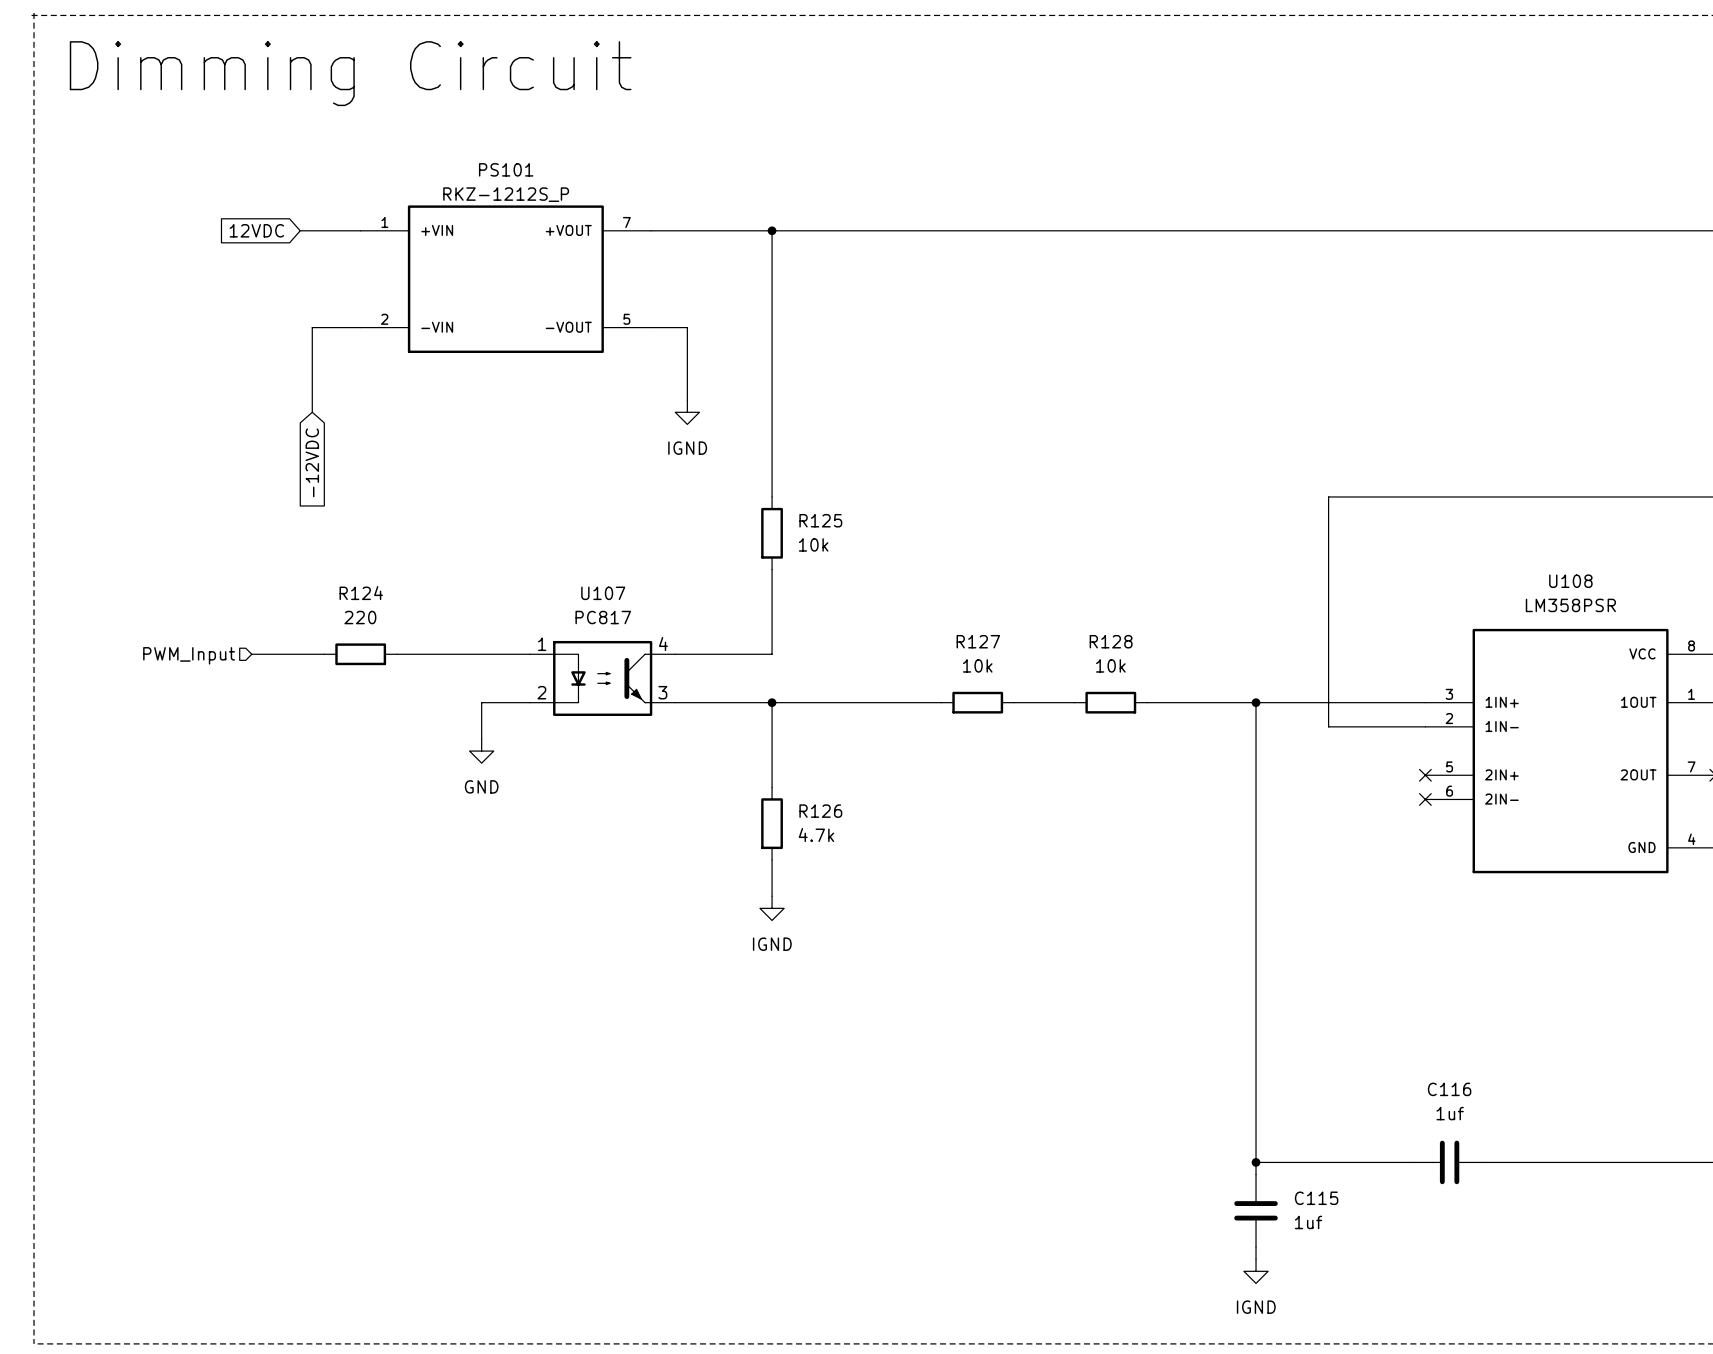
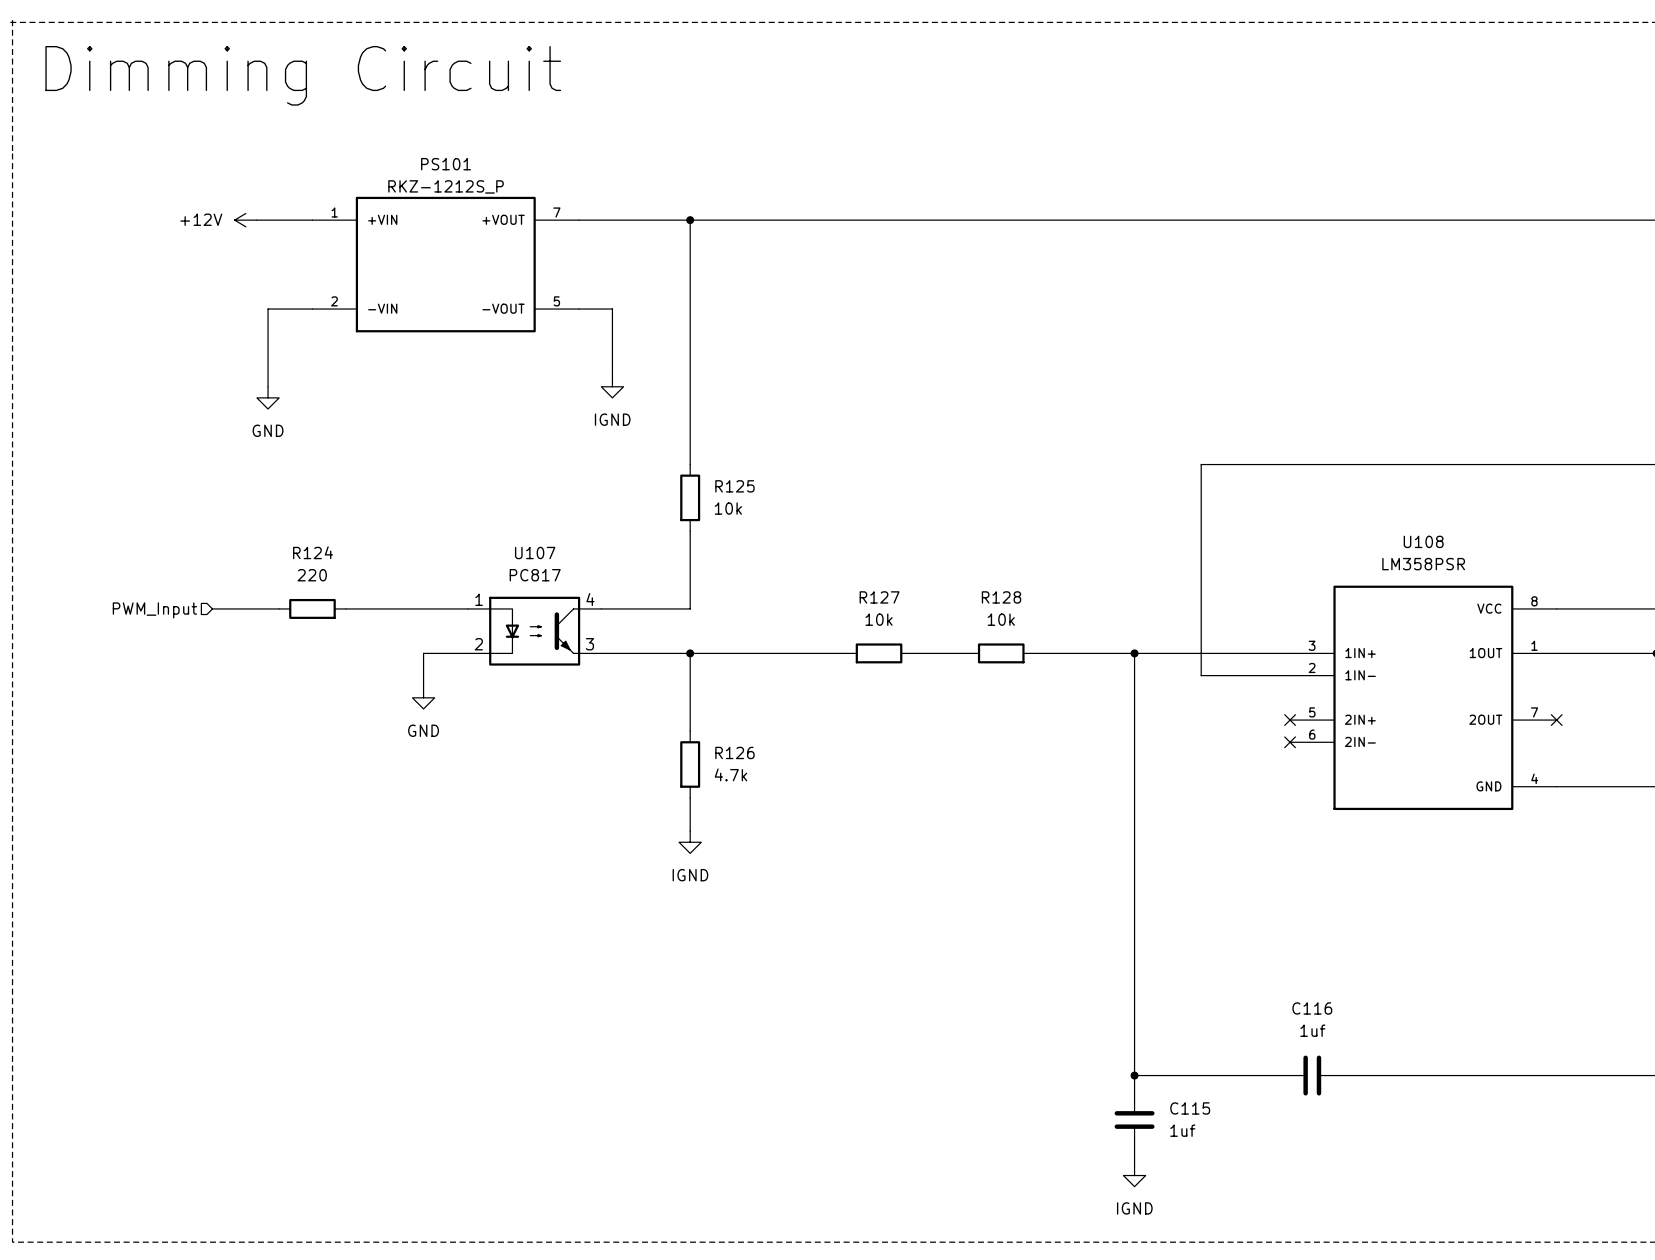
global label: 12VDC (256, 230) -> none
power symbol: none -> +12V (245, 220)
power symbol: none -> GND (268, 397)
global label: -12VDC (312, 462) -> none

